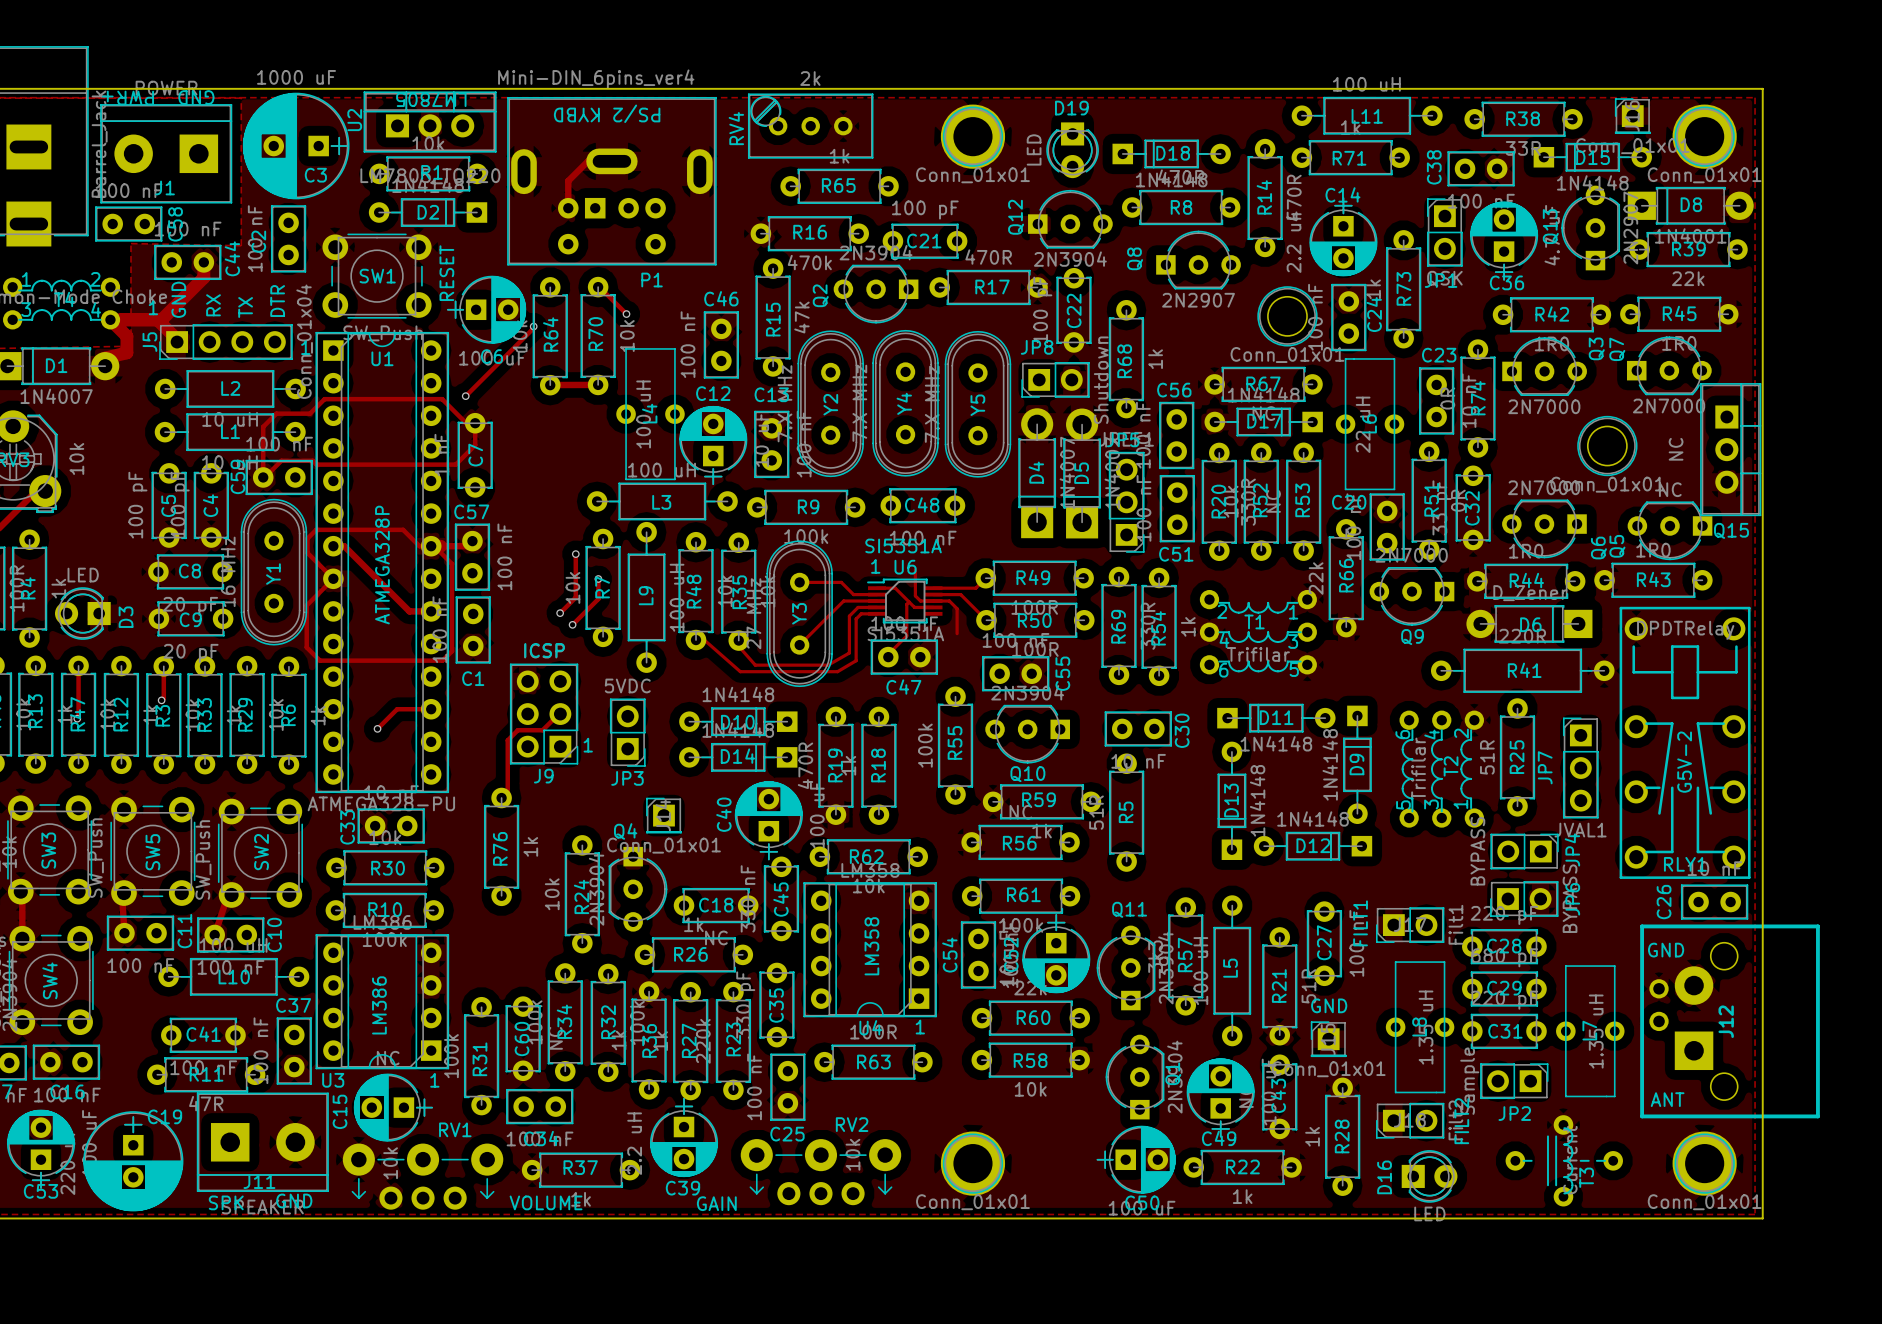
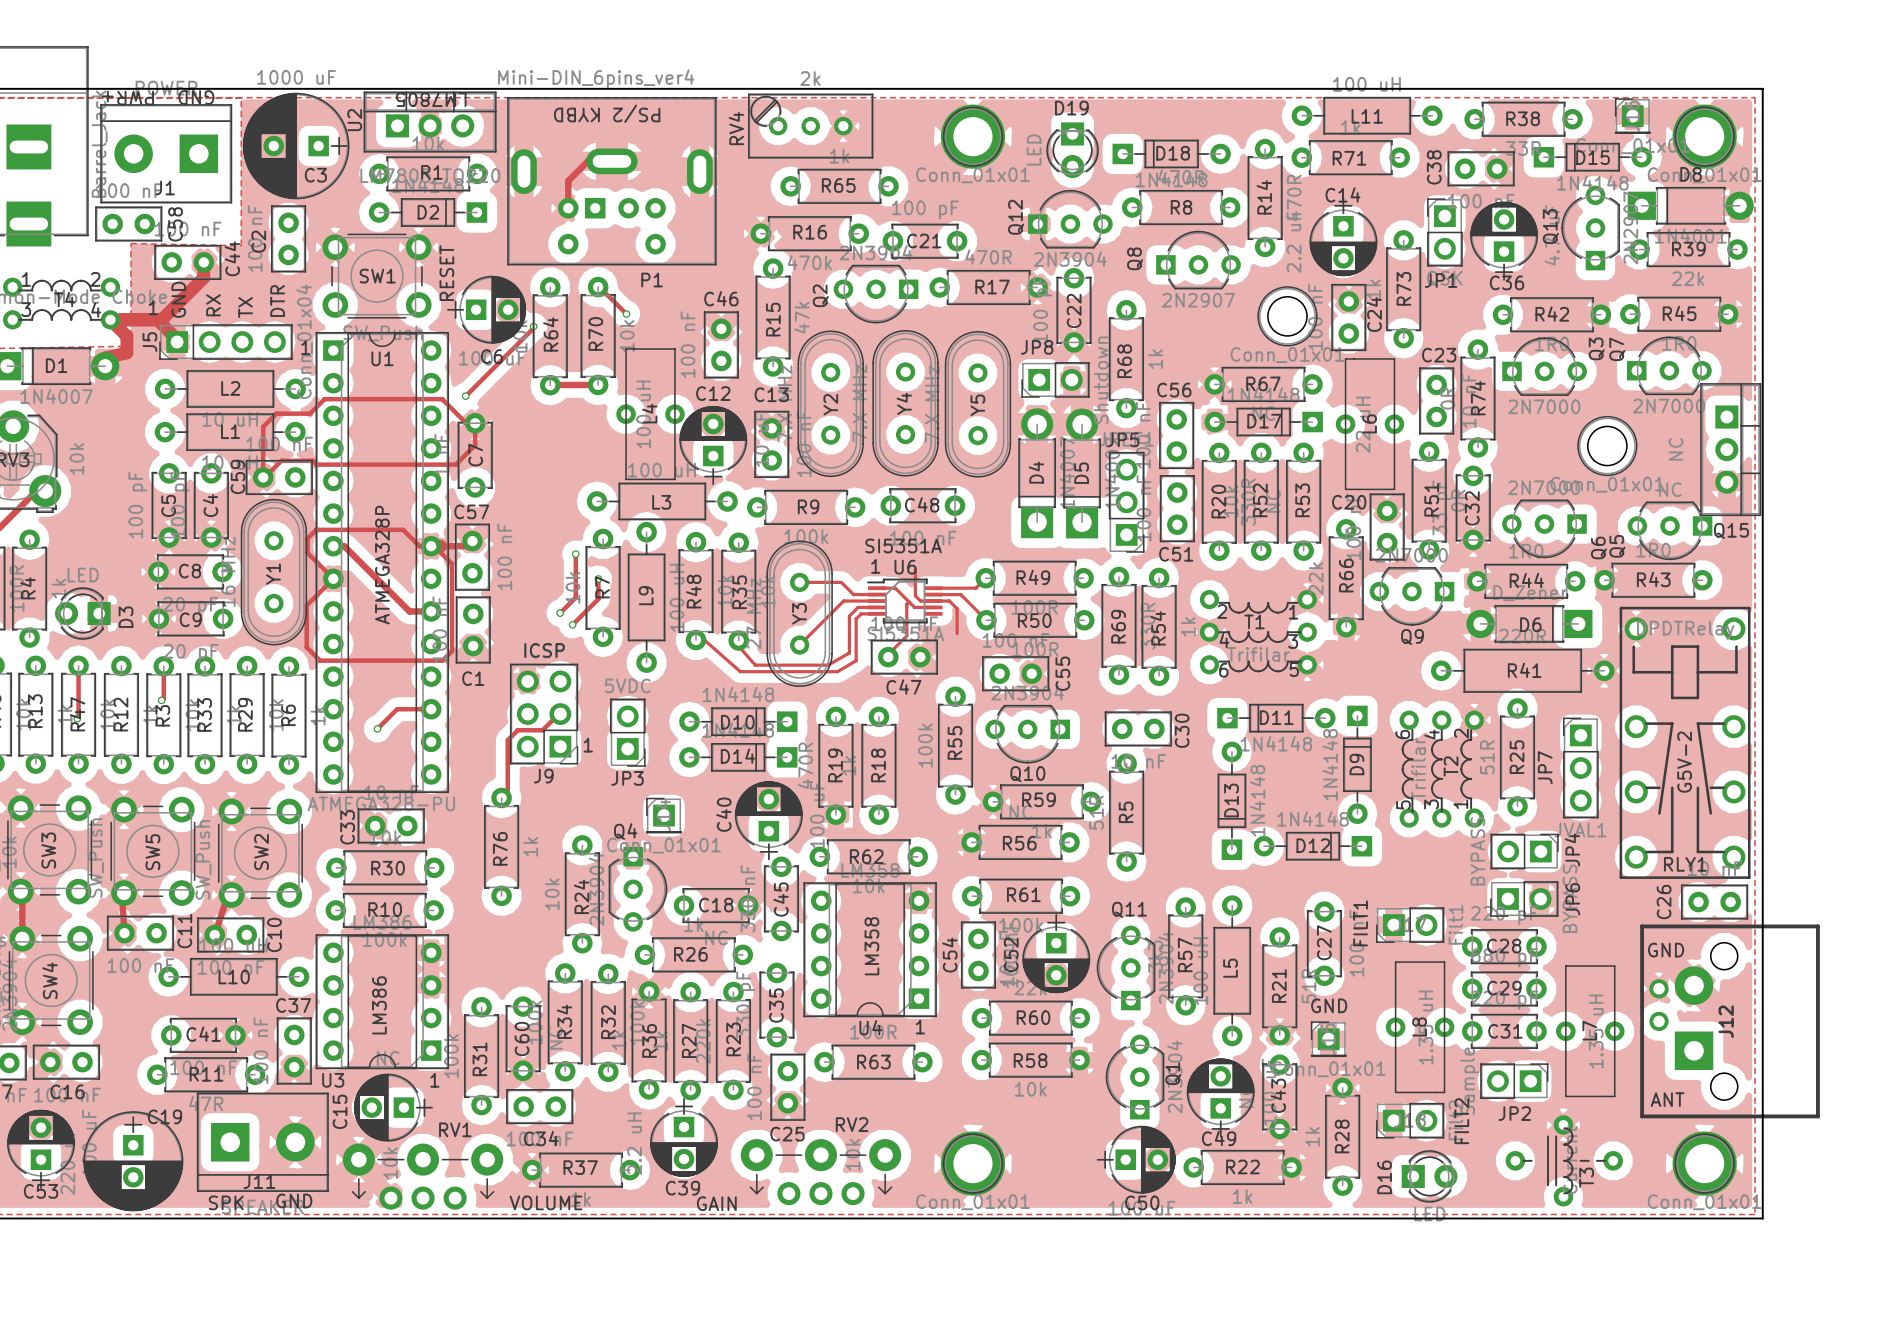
D8 name position: D8 (1691, 204) -> D8 (1691, 174)

